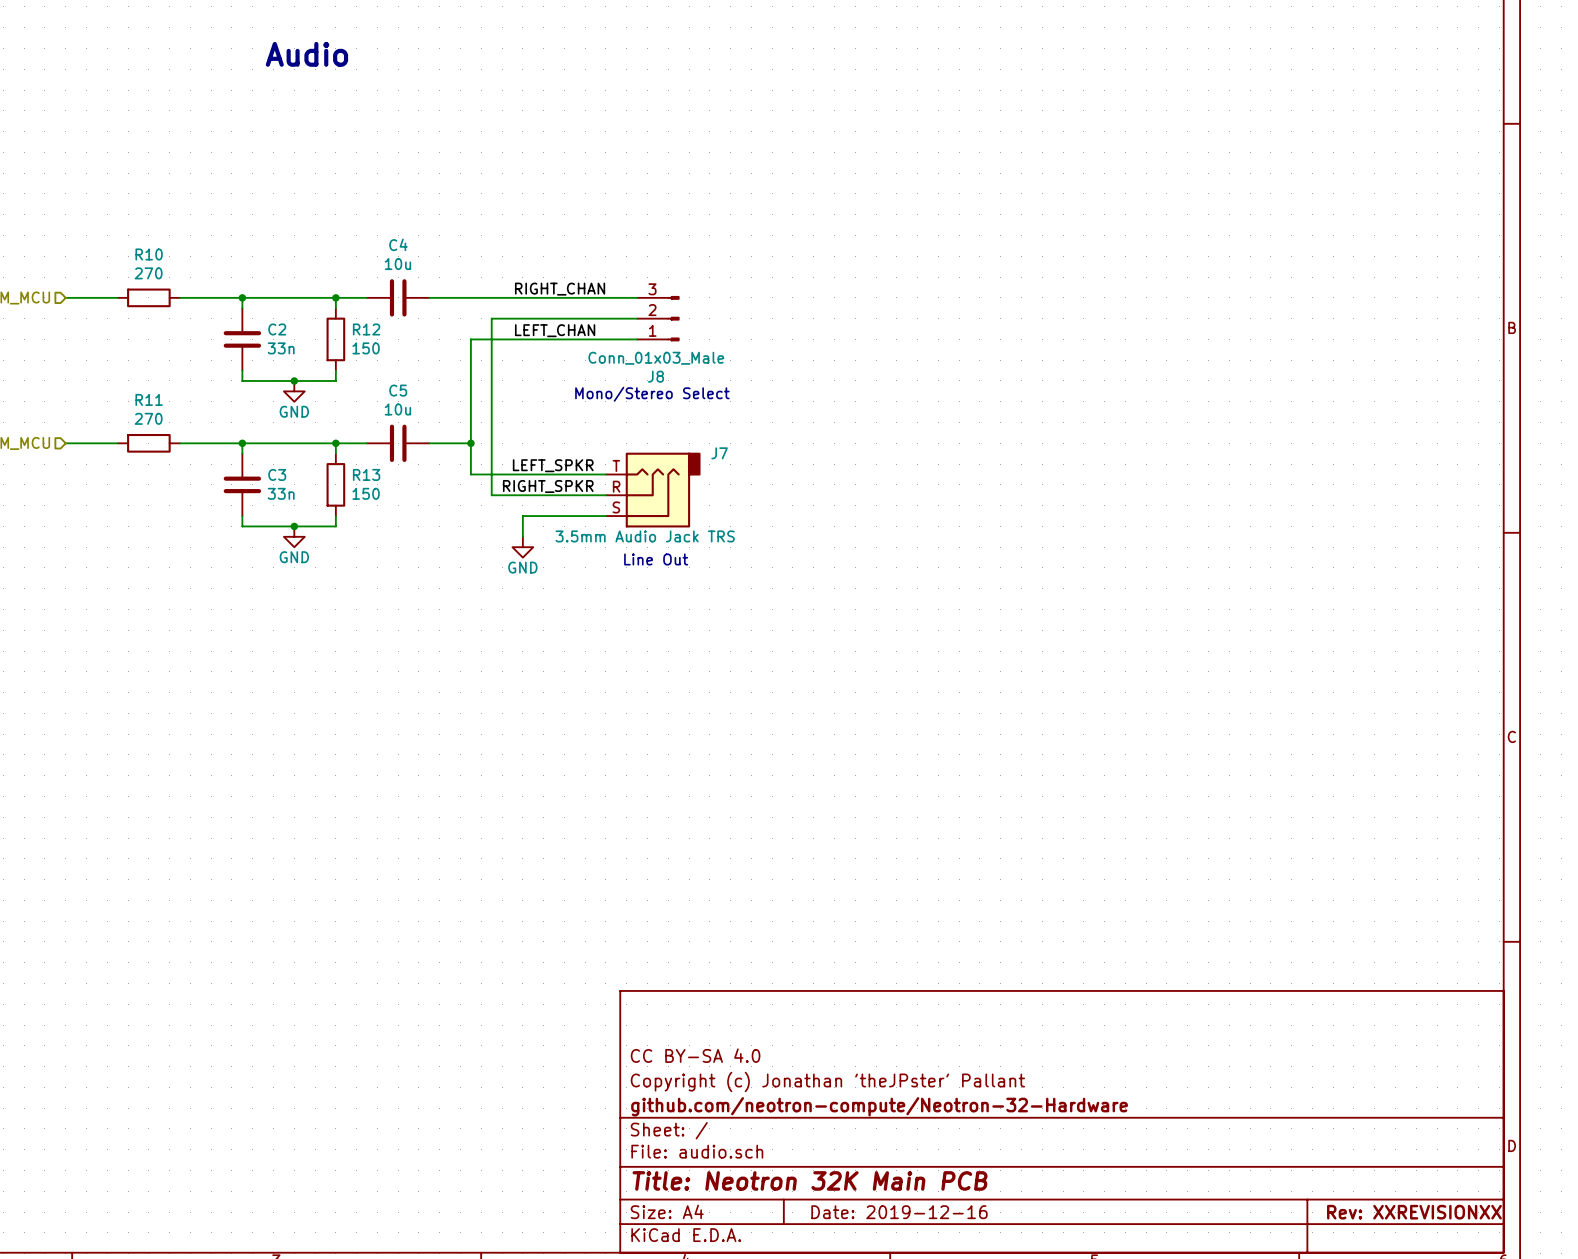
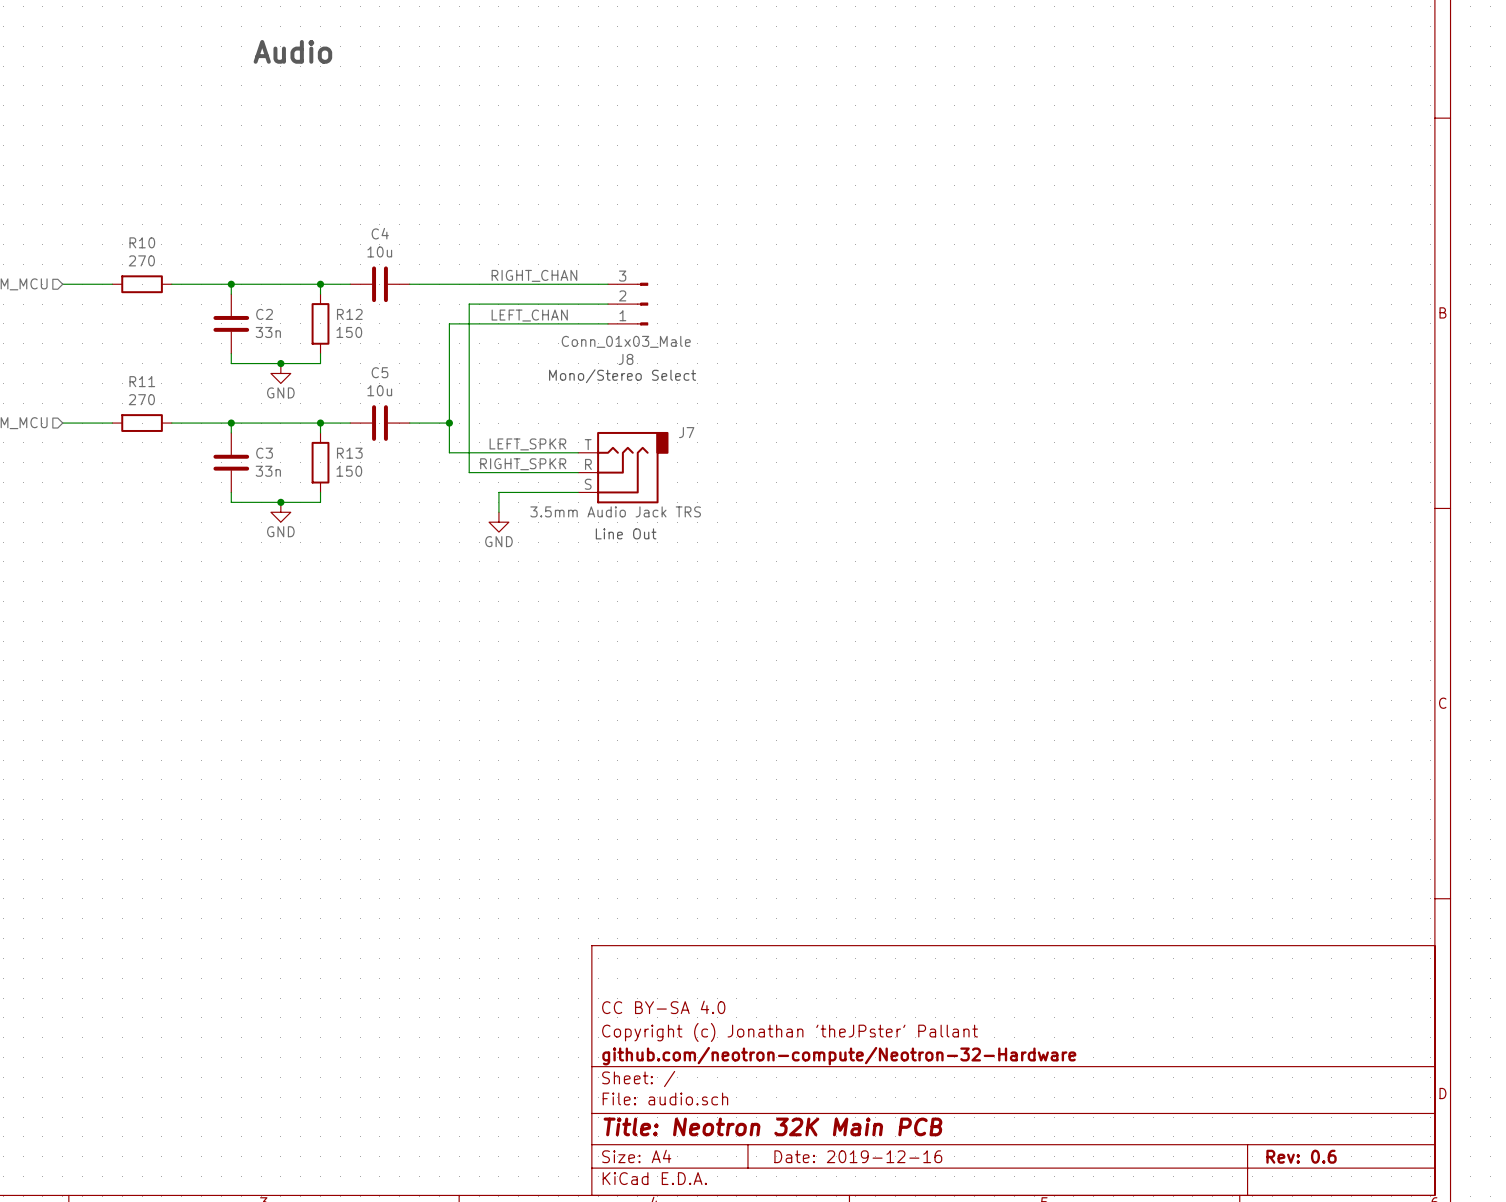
title block: Rev: XXREVISIONXX (1414, 1212) -> Rev: 0.6 (1301, 1156)

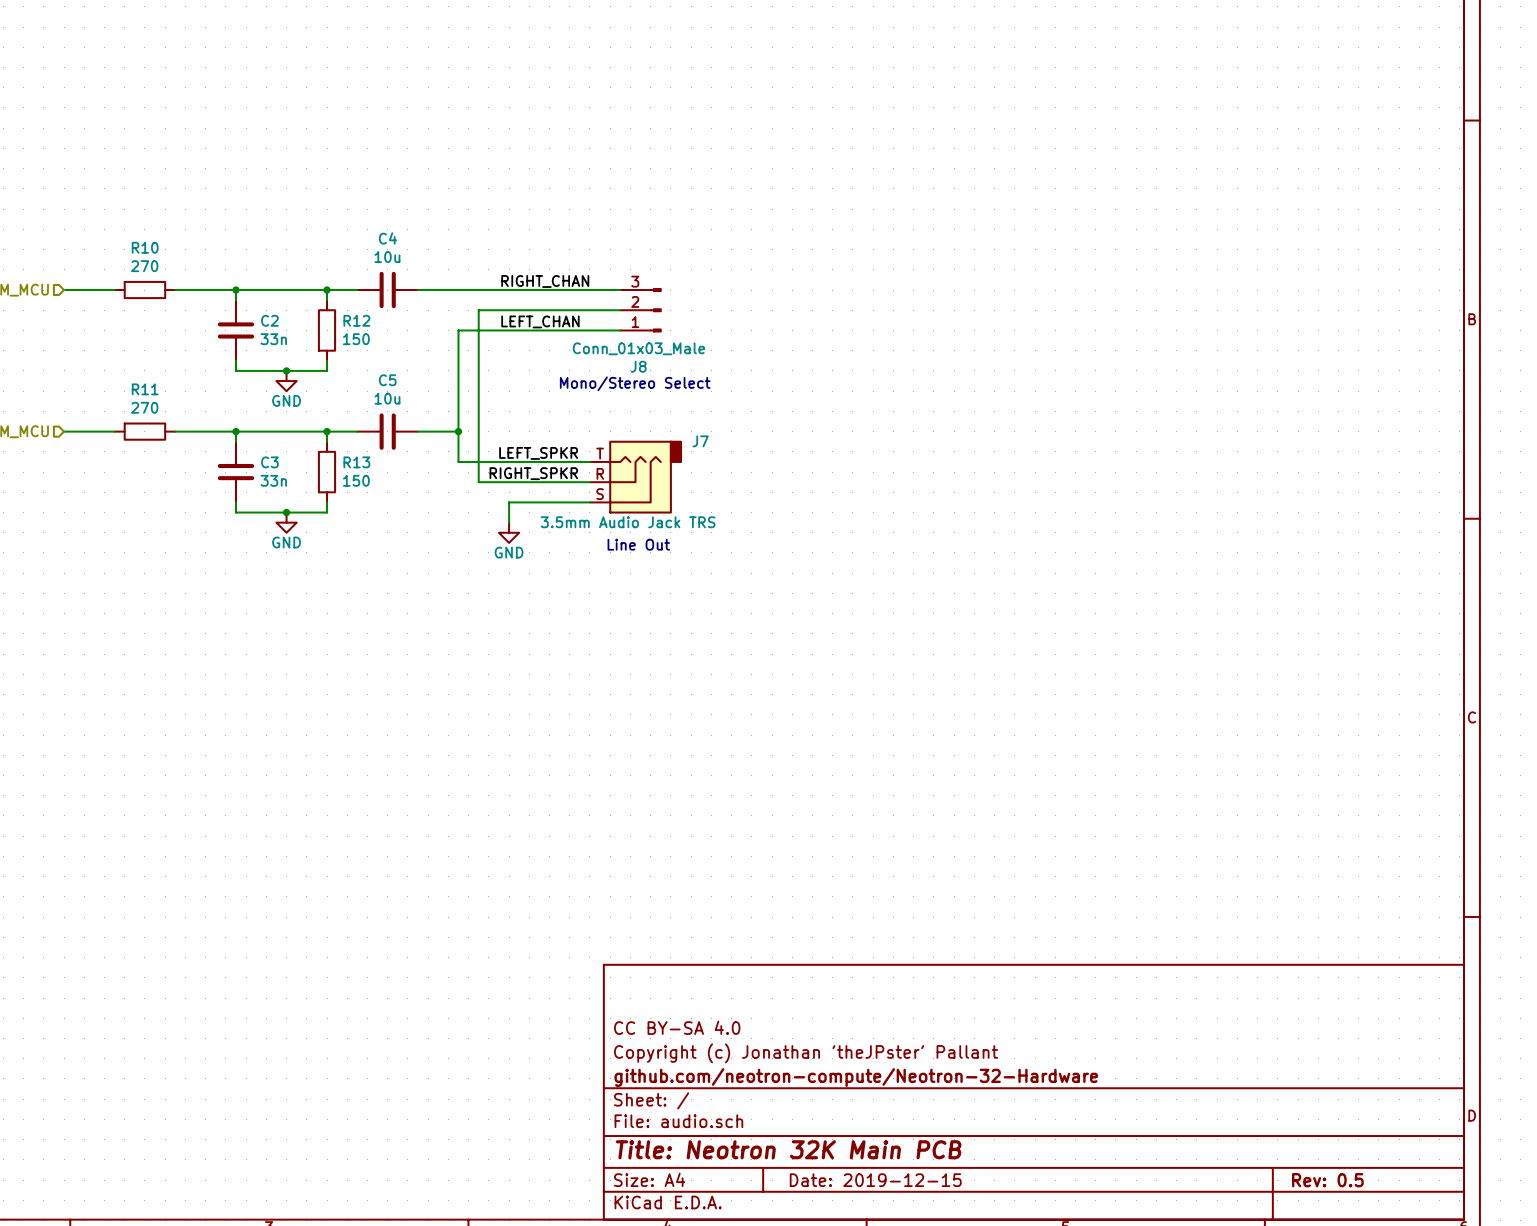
text: Audio (292, 51) -> none
title block: Date: 2019-12-16 (858, 1156) -> Date: 2019-12-15 (875, 1180)
title block: Rev: 0.6 (1301, 1156) -> Rev: 0.5 (1327, 1180)

